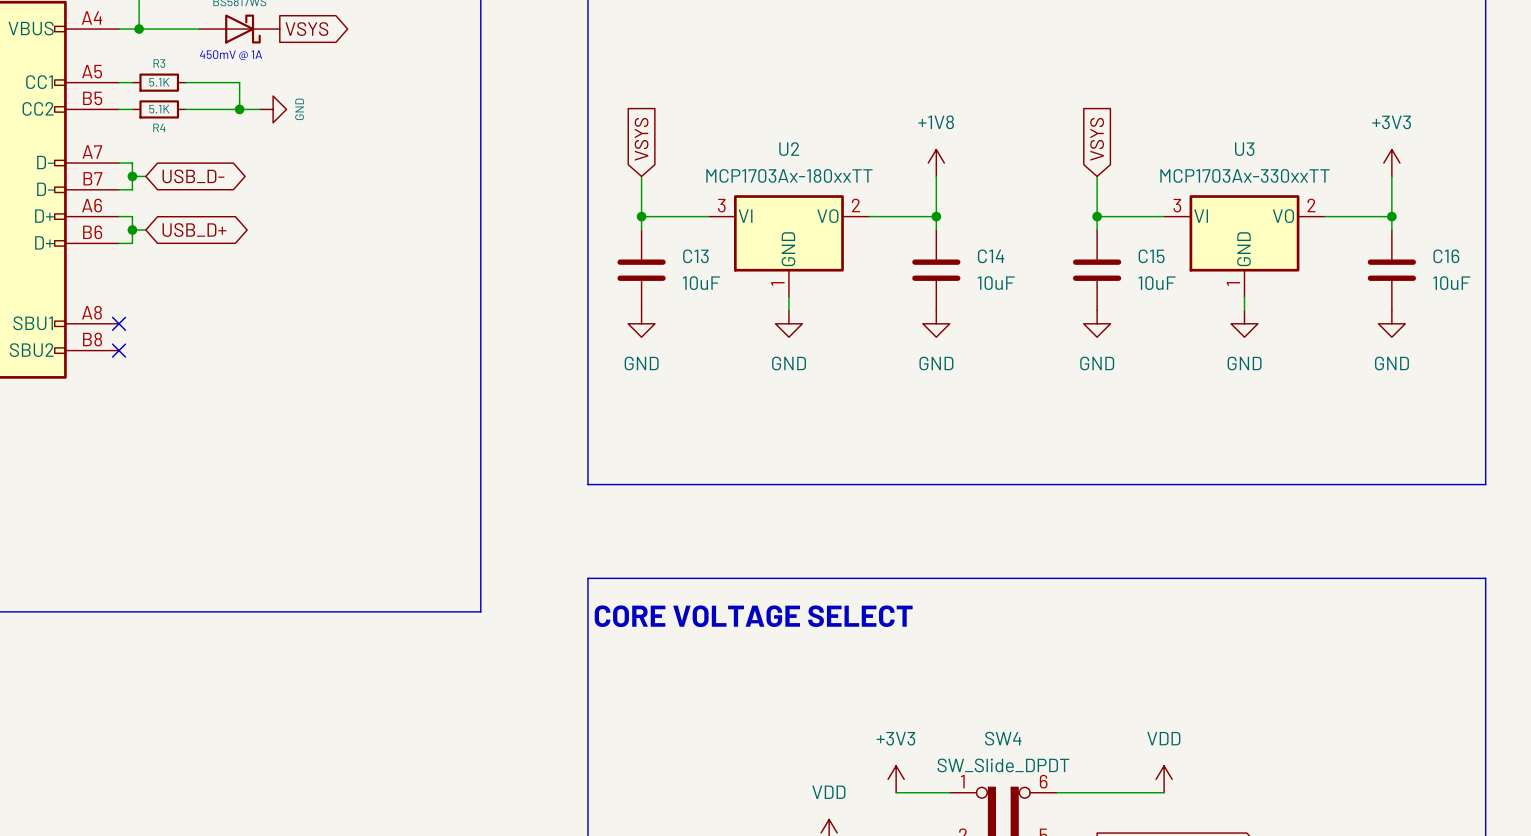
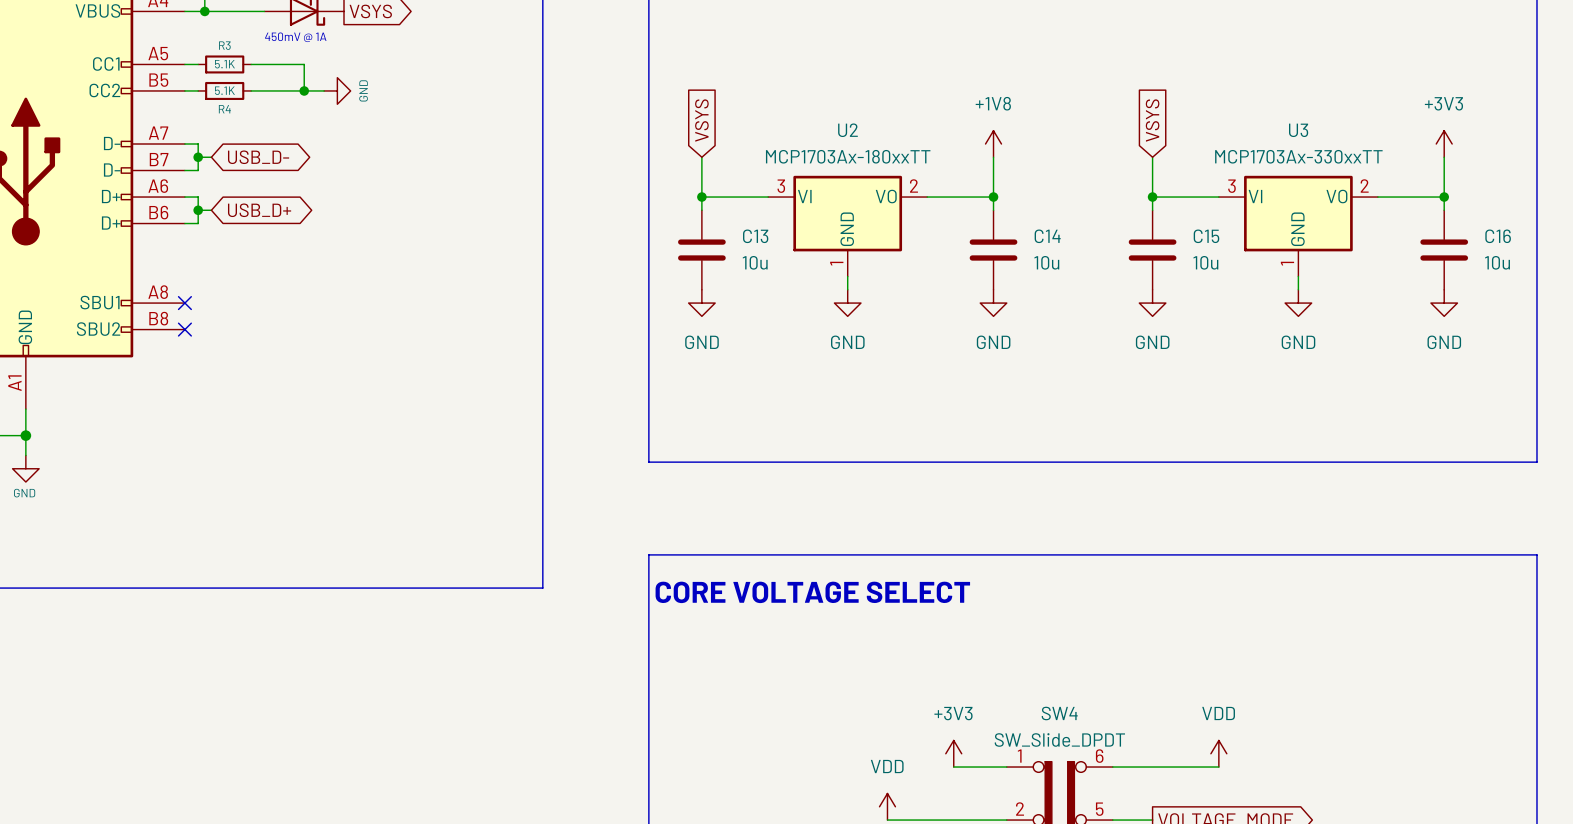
C13 value: 10uF (701, 283) -> 10u (755, 262)
C14 value: 10uF (996, 283) -> 10u (1046, 262)
C15 value: 10uF (1156, 283) -> 10u (1205, 262)
C16 value: 10uF (1451, 283) -> 10u (1497, 262)

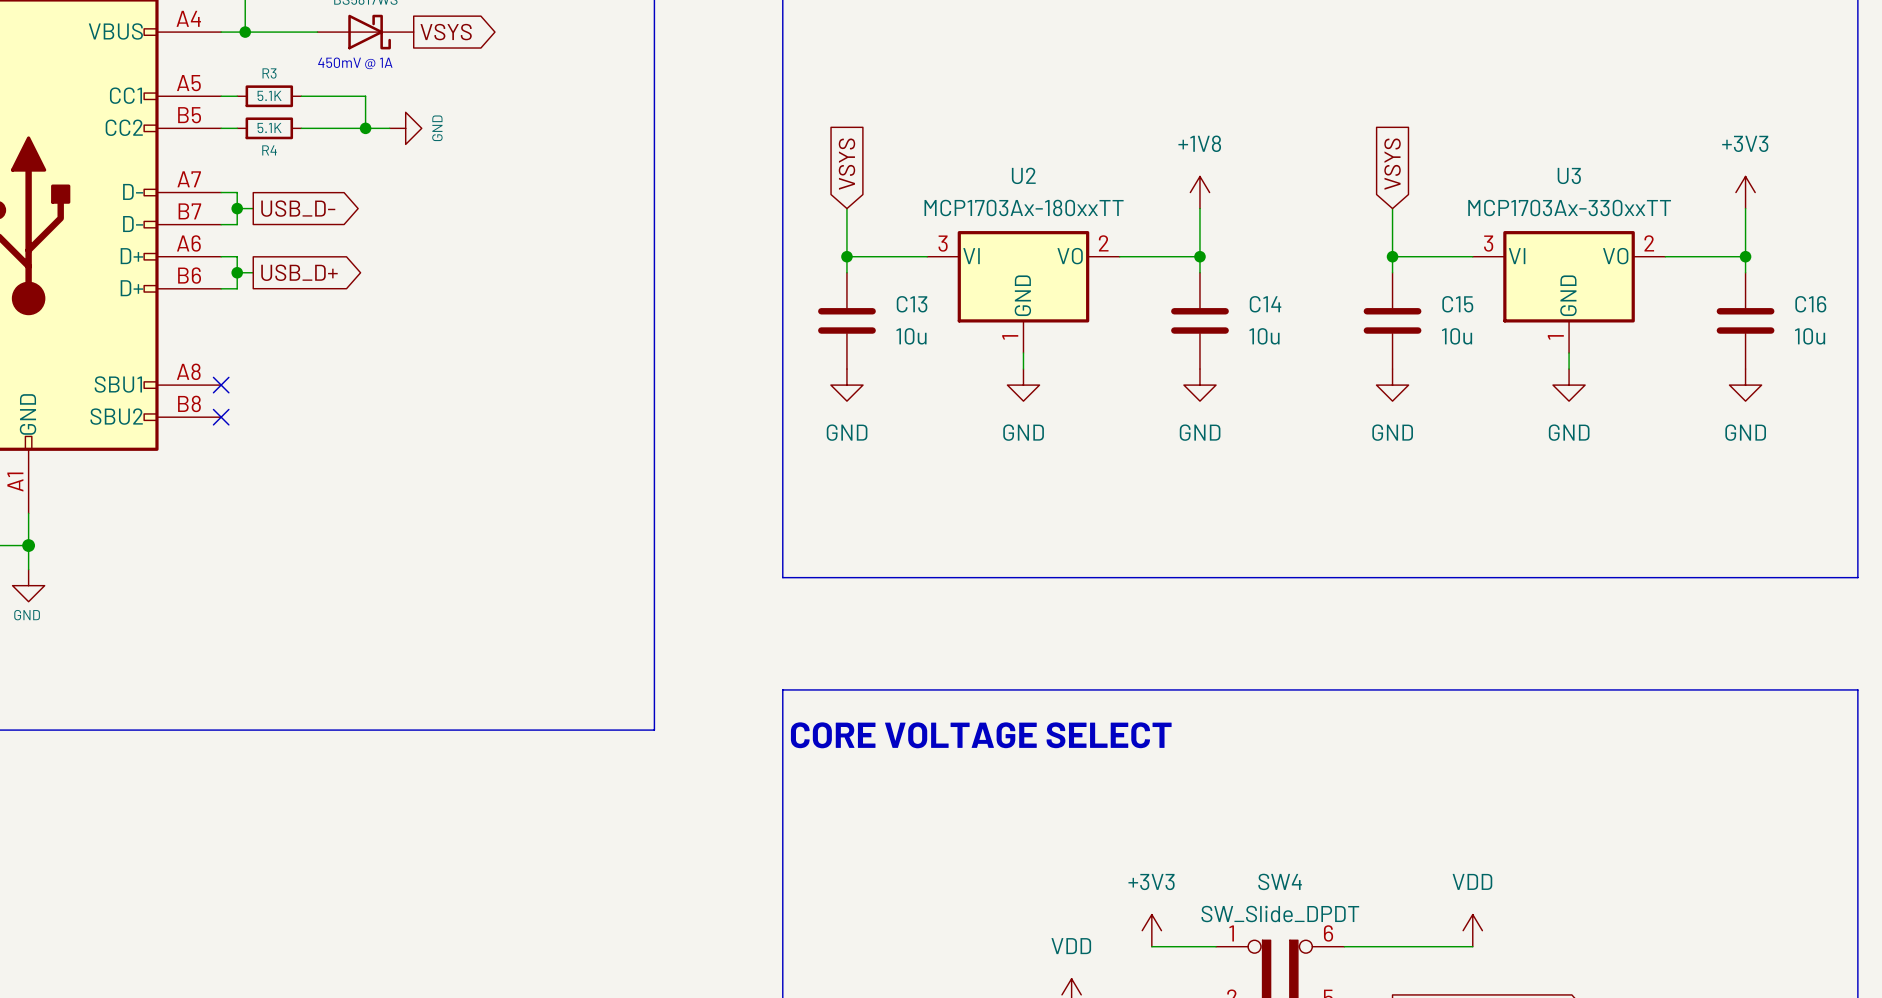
global label shape: bidirectional (258, 157) -> output (298, 208)
global label shape: bidirectional (259, 210) -> output (299, 272)

